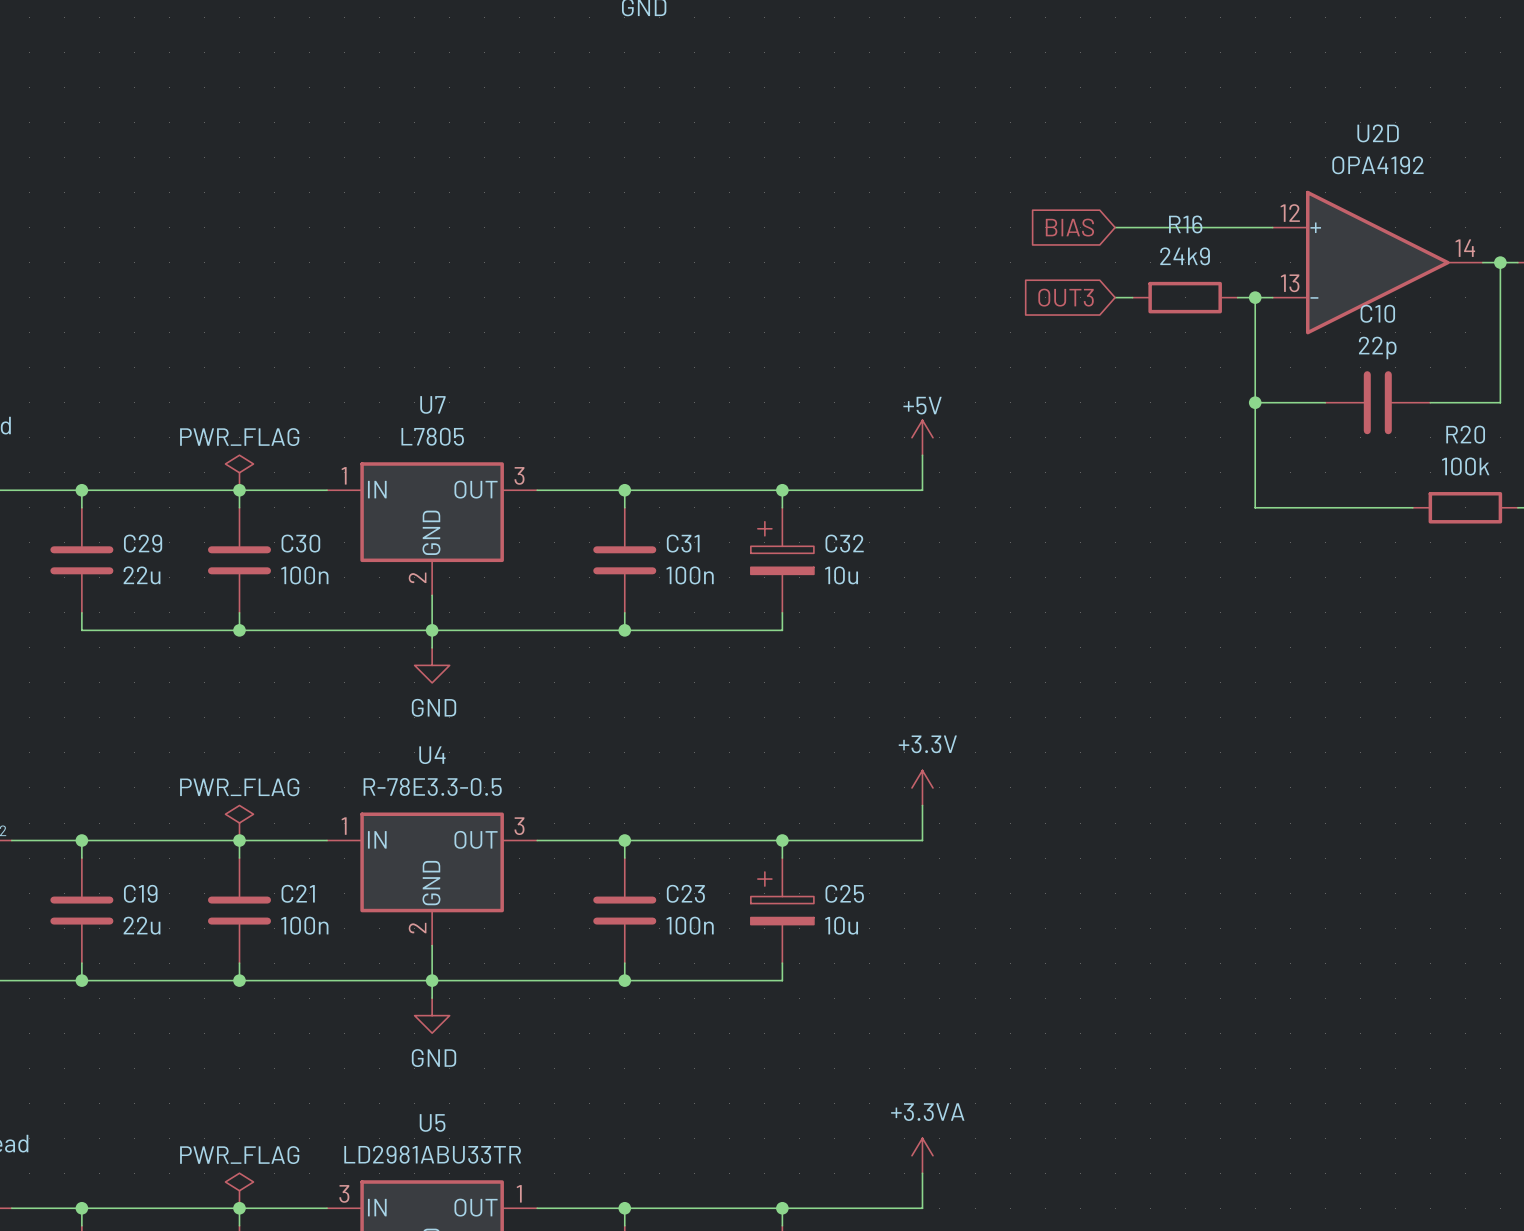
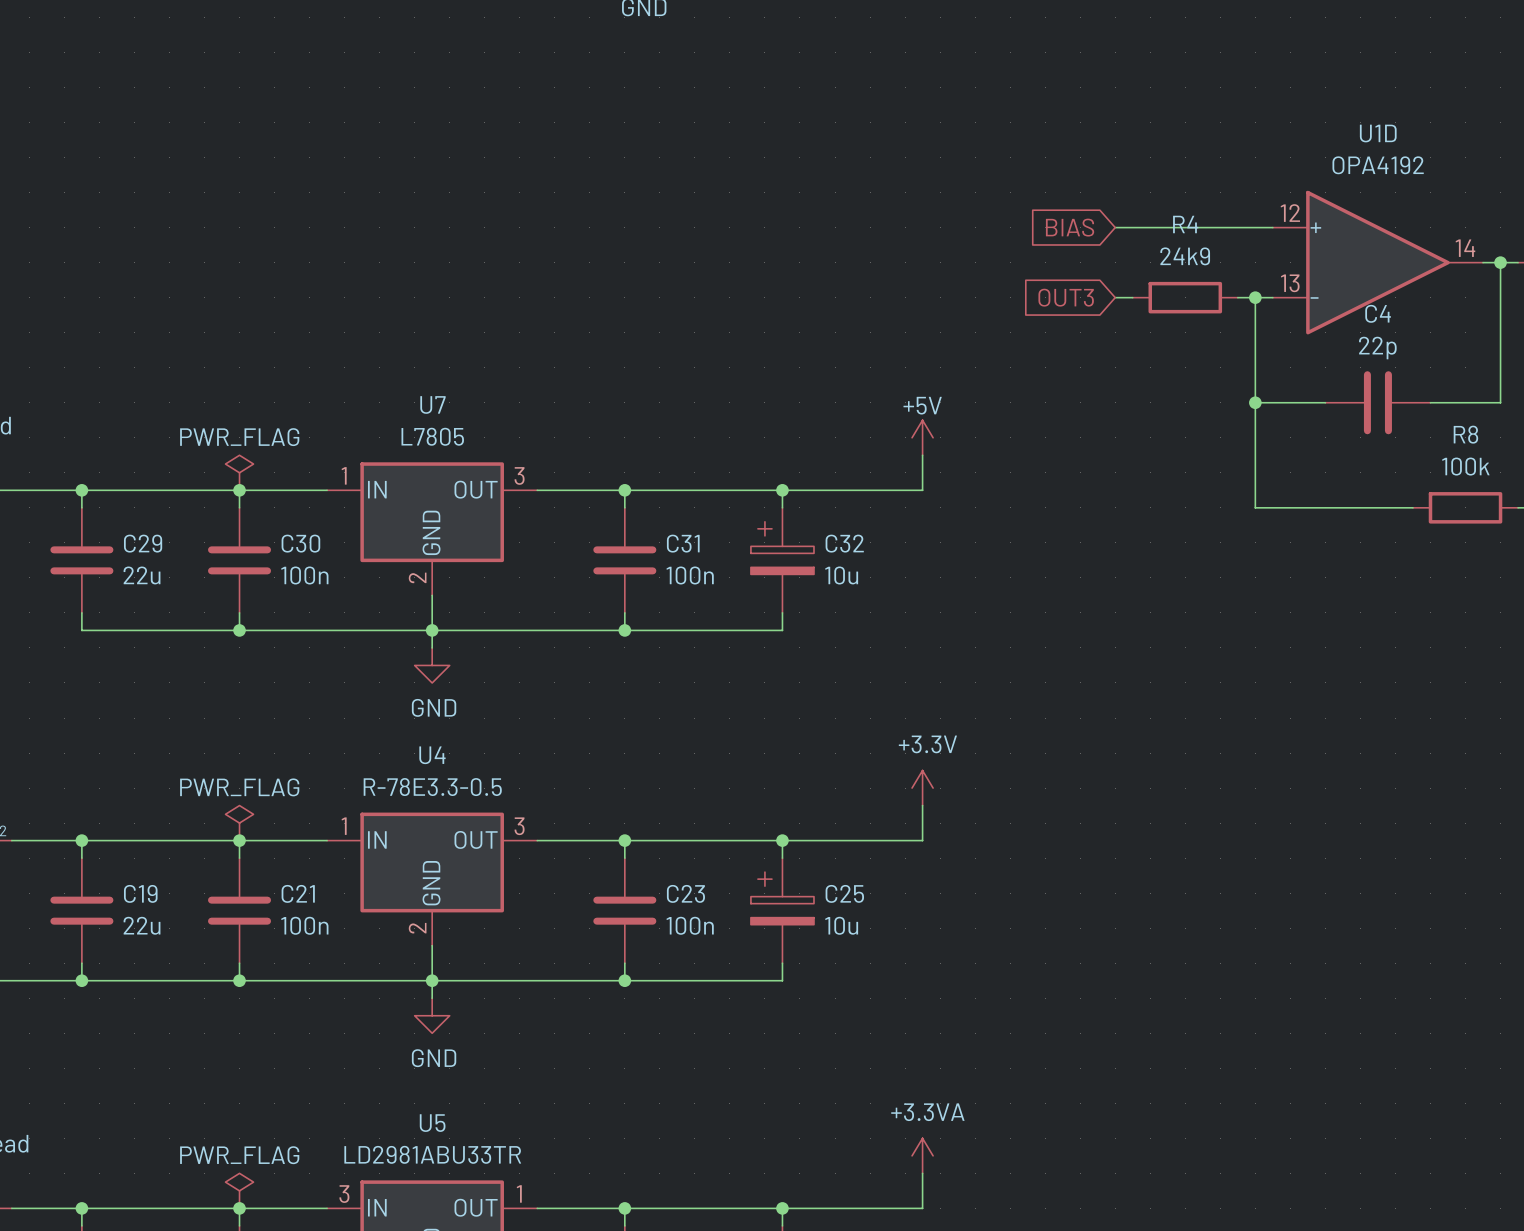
U2D name: U2D (1378, 133) -> U1D (1378, 133)
R16 name: R16 (1185, 224) -> R4 (1185, 224)
C10 name: C10 (1377, 313) -> C4 (1378, 313)
R20 name: R20 (1465, 434) -> R8 (1465, 434)

